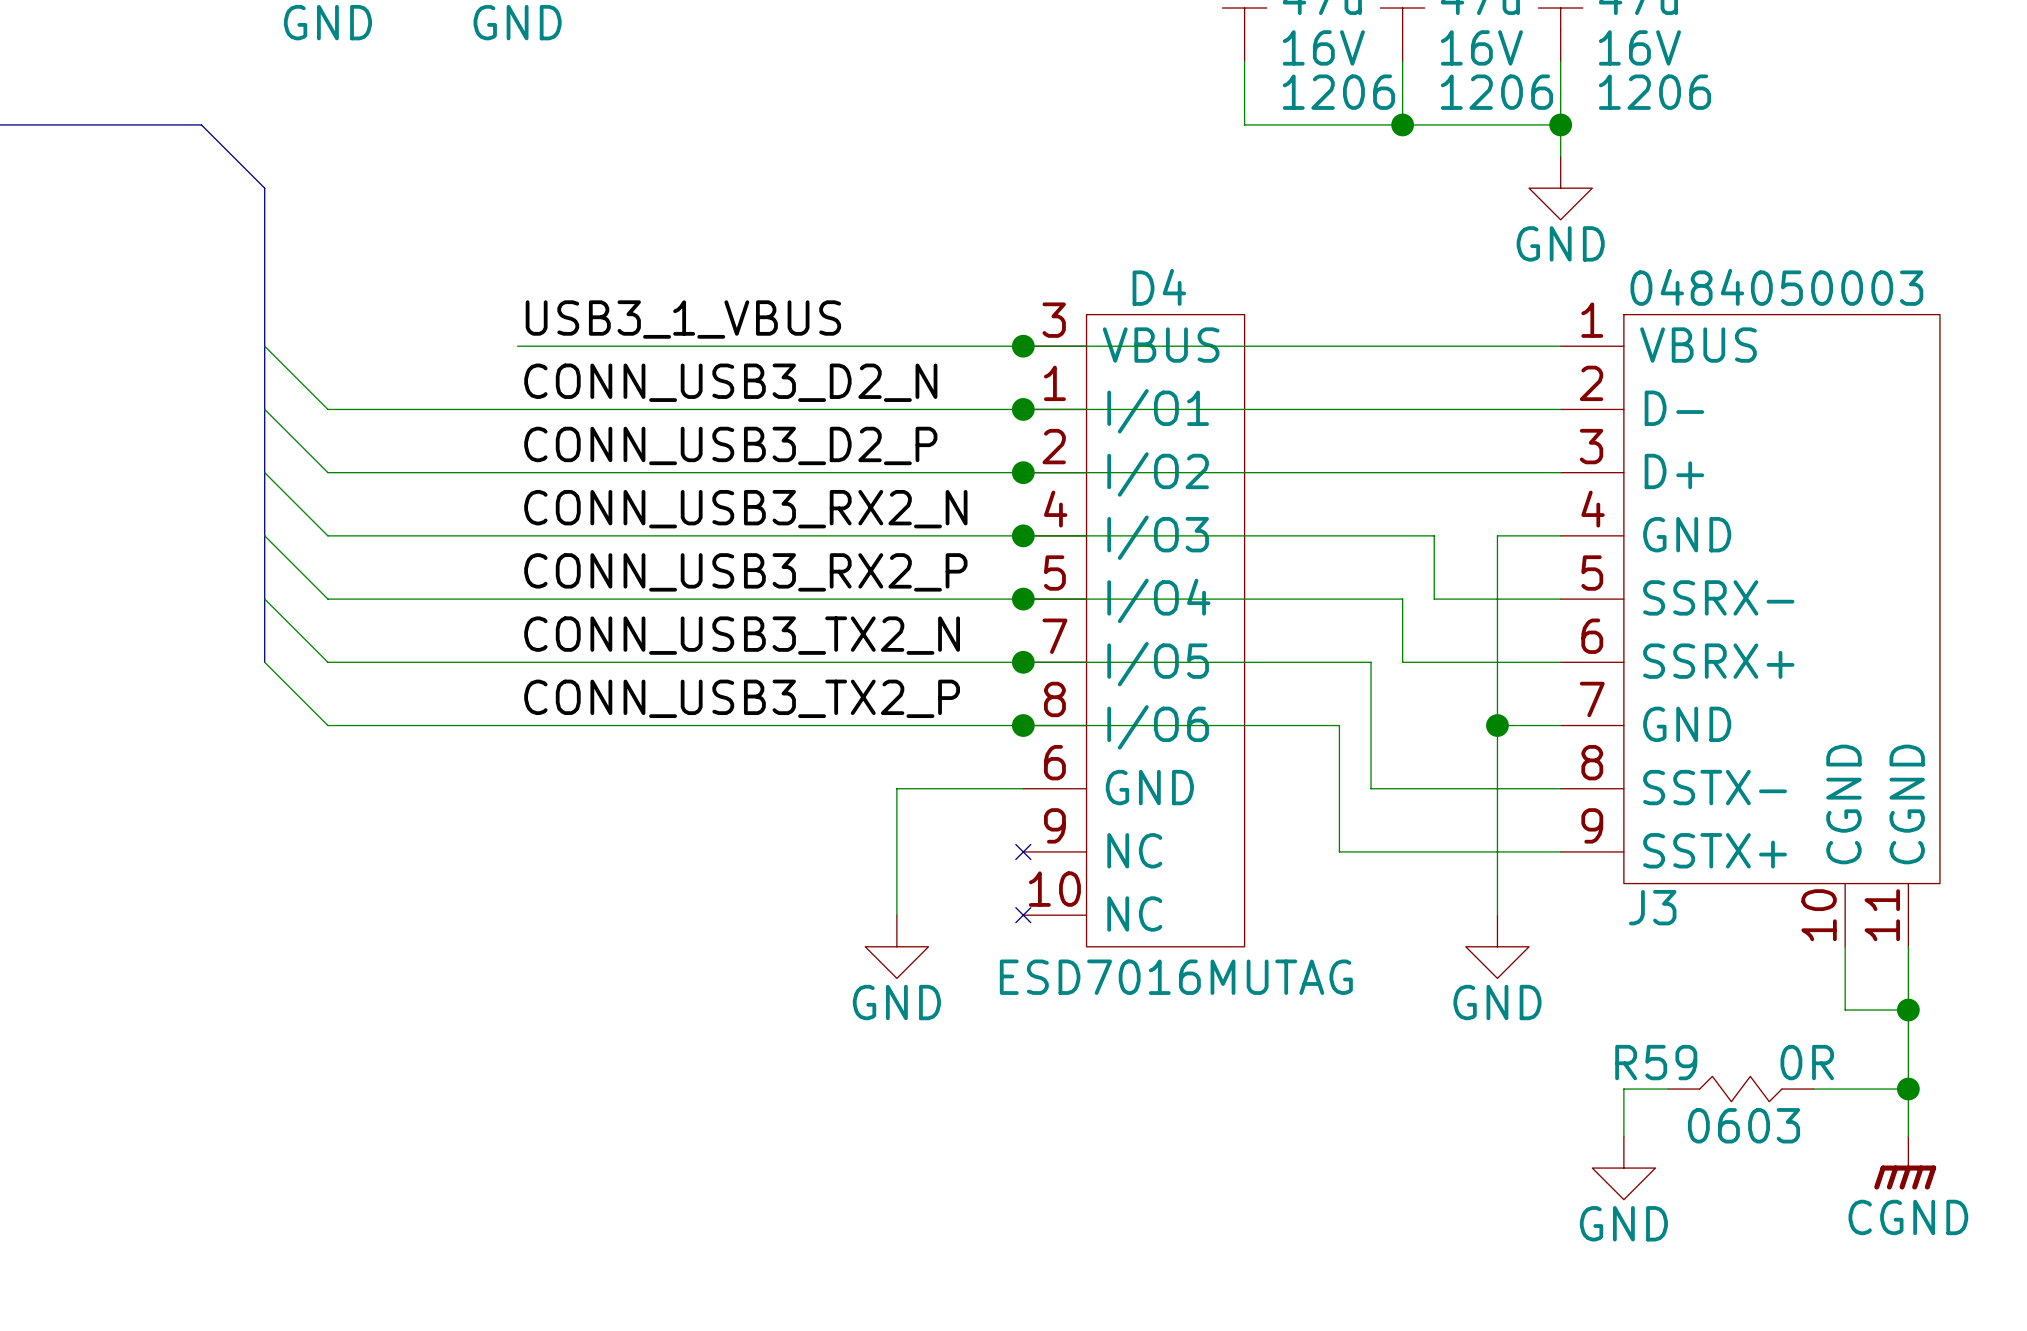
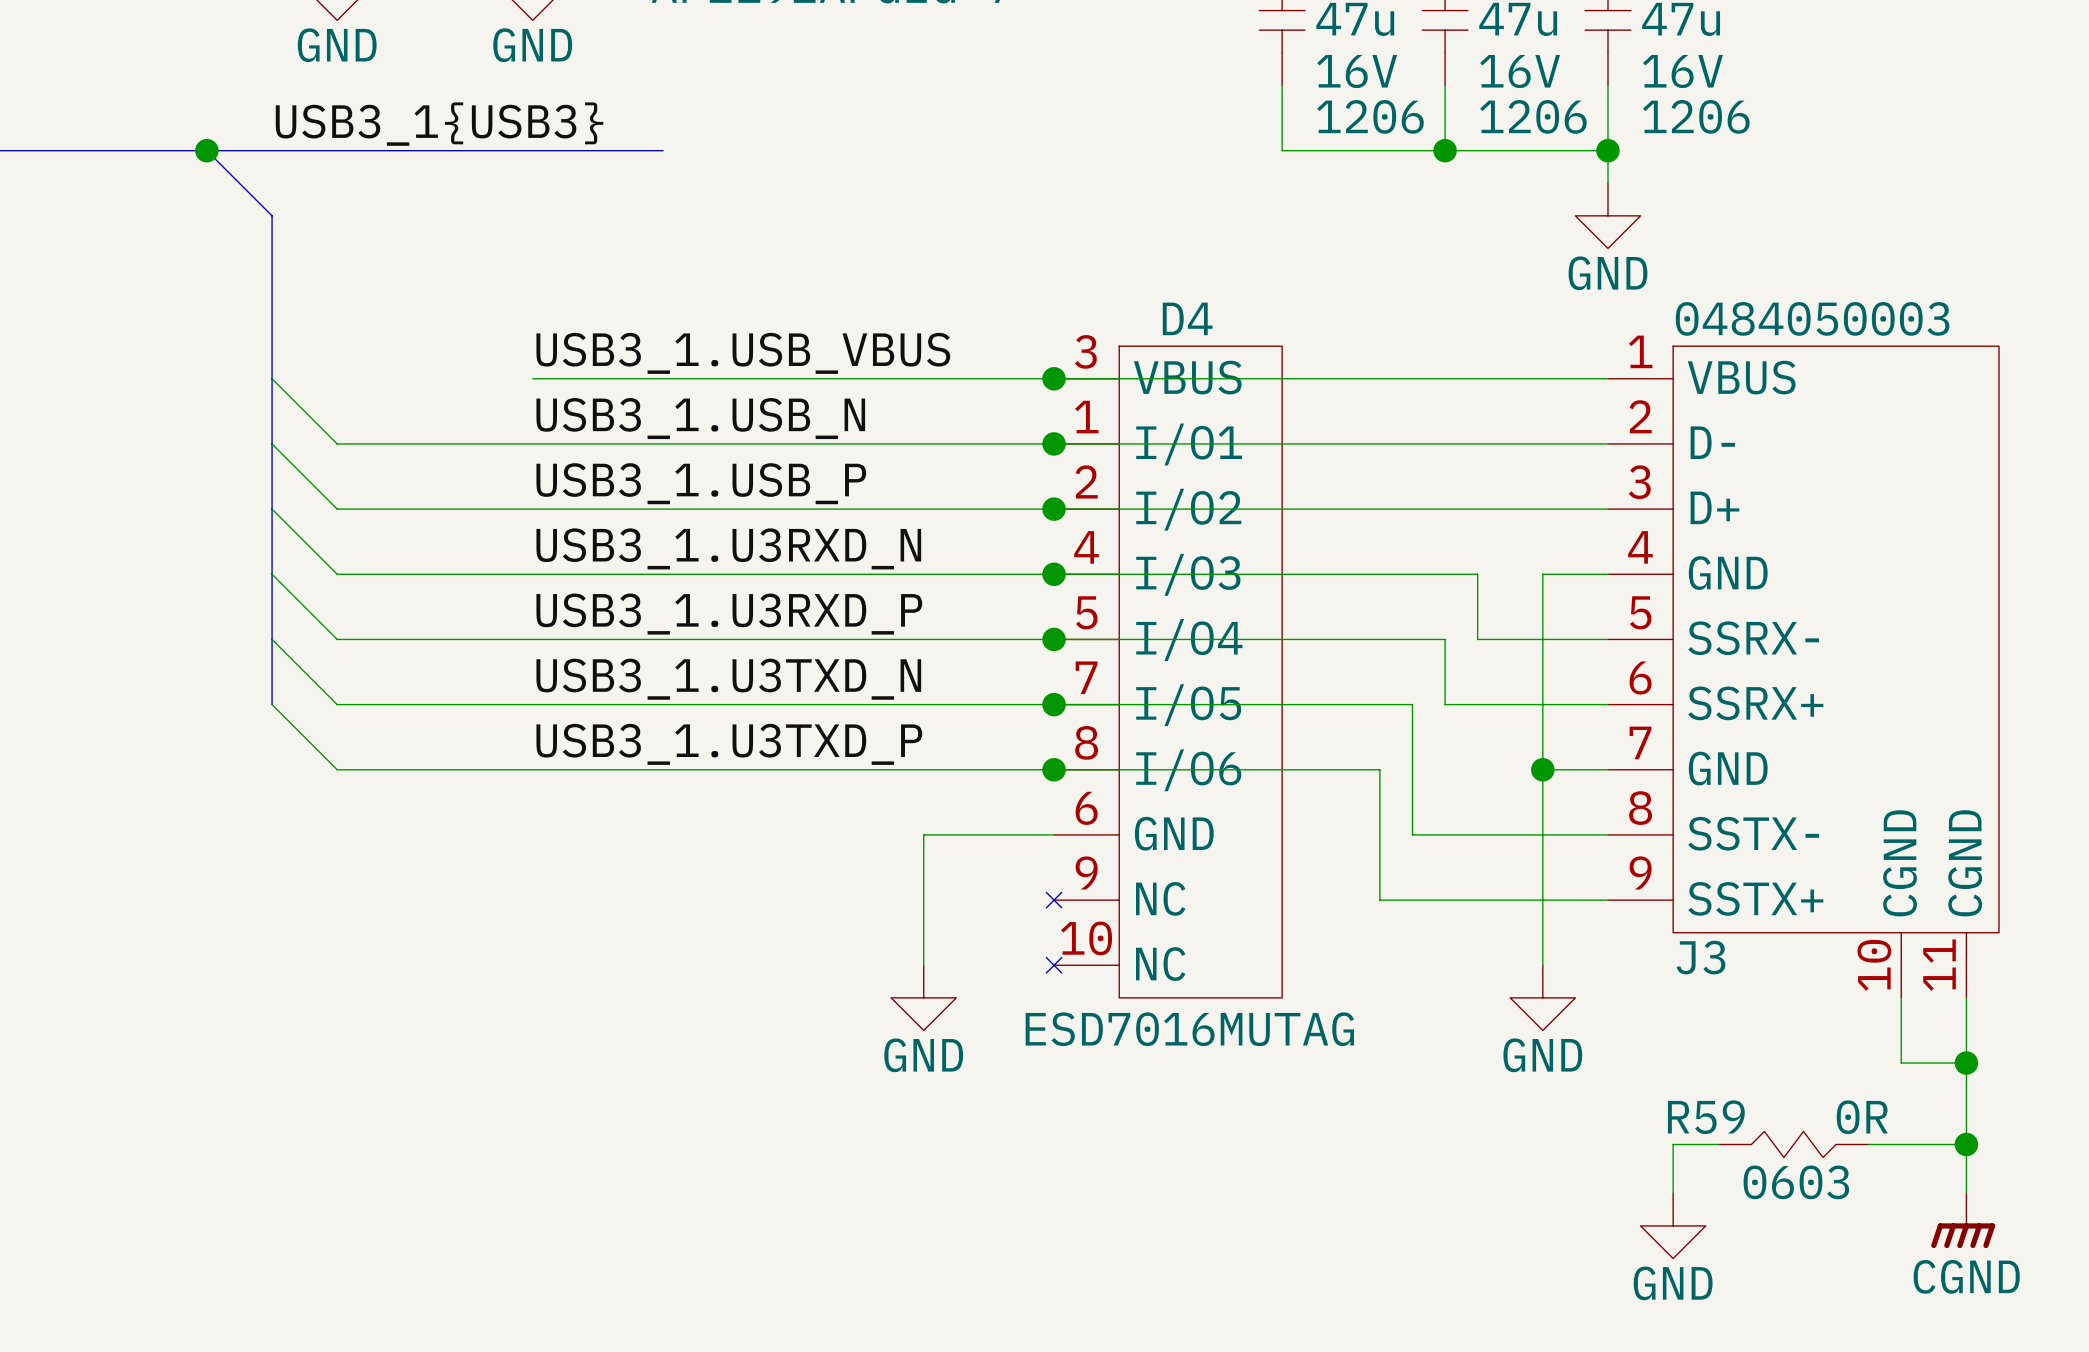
label: none -> USB3_1{USB3} (439, 124)
bus: none -> (206, 150) (663, 150)
junction: none -> (206, 150)
label: USB3_1_VBUS (683, 319) -> USB3_1.USB_VBUS (743, 353)
label: CONN_USB3_D2_N (730, 382) -> USB3_1.USB_N (700, 418)
label: CONN_USB3_D2_P (730, 445) -> USB3_1.USB_P (701, 483)
label: CONN_USB3_RX2_N (745, 509) -> USB3_1.U3RXD_N (728, 548)
label: CONN_USB3_RX2_P (745, 572) -> USB3_1.U3RXD_P (729, 614)
label: CONN_USB3_TX2_N (742, 635) -> USB3_1.U3TXD_N (728, 679)
label: CONN_USB3_TX2_P (742, 698) -> USB3_1.U3TXD_P (729, 744)

